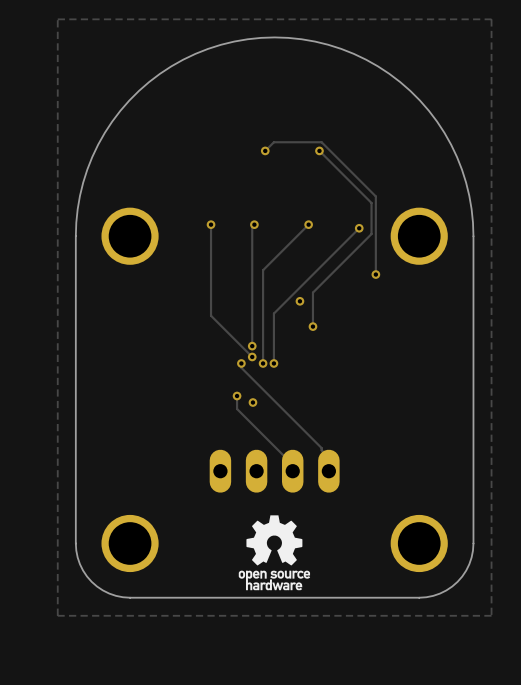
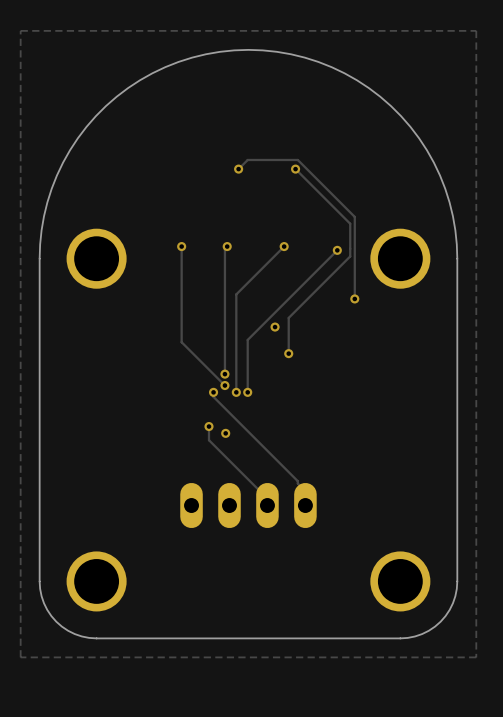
drawing: [238, 515, 311, 591] -> none

